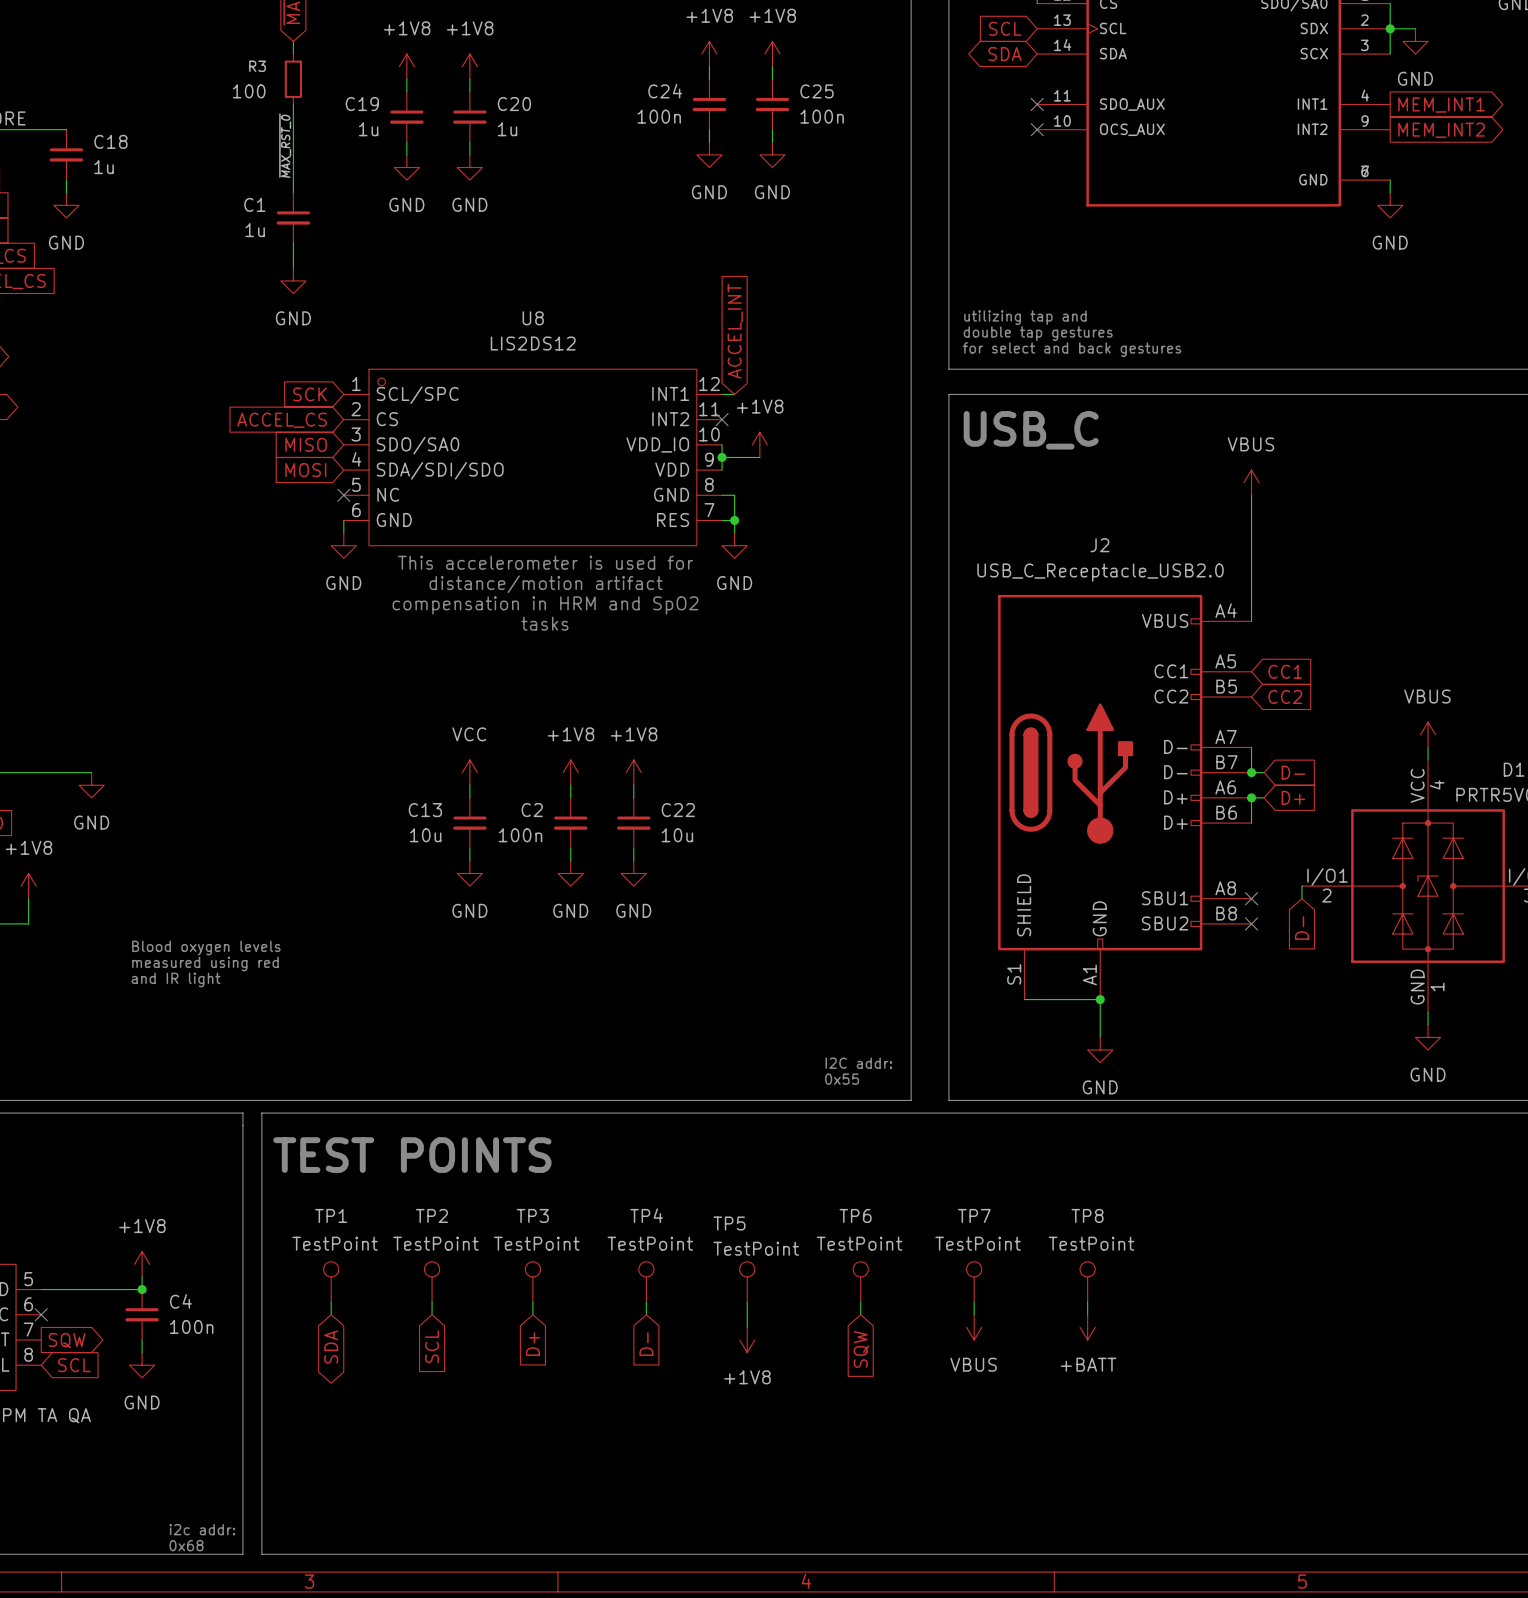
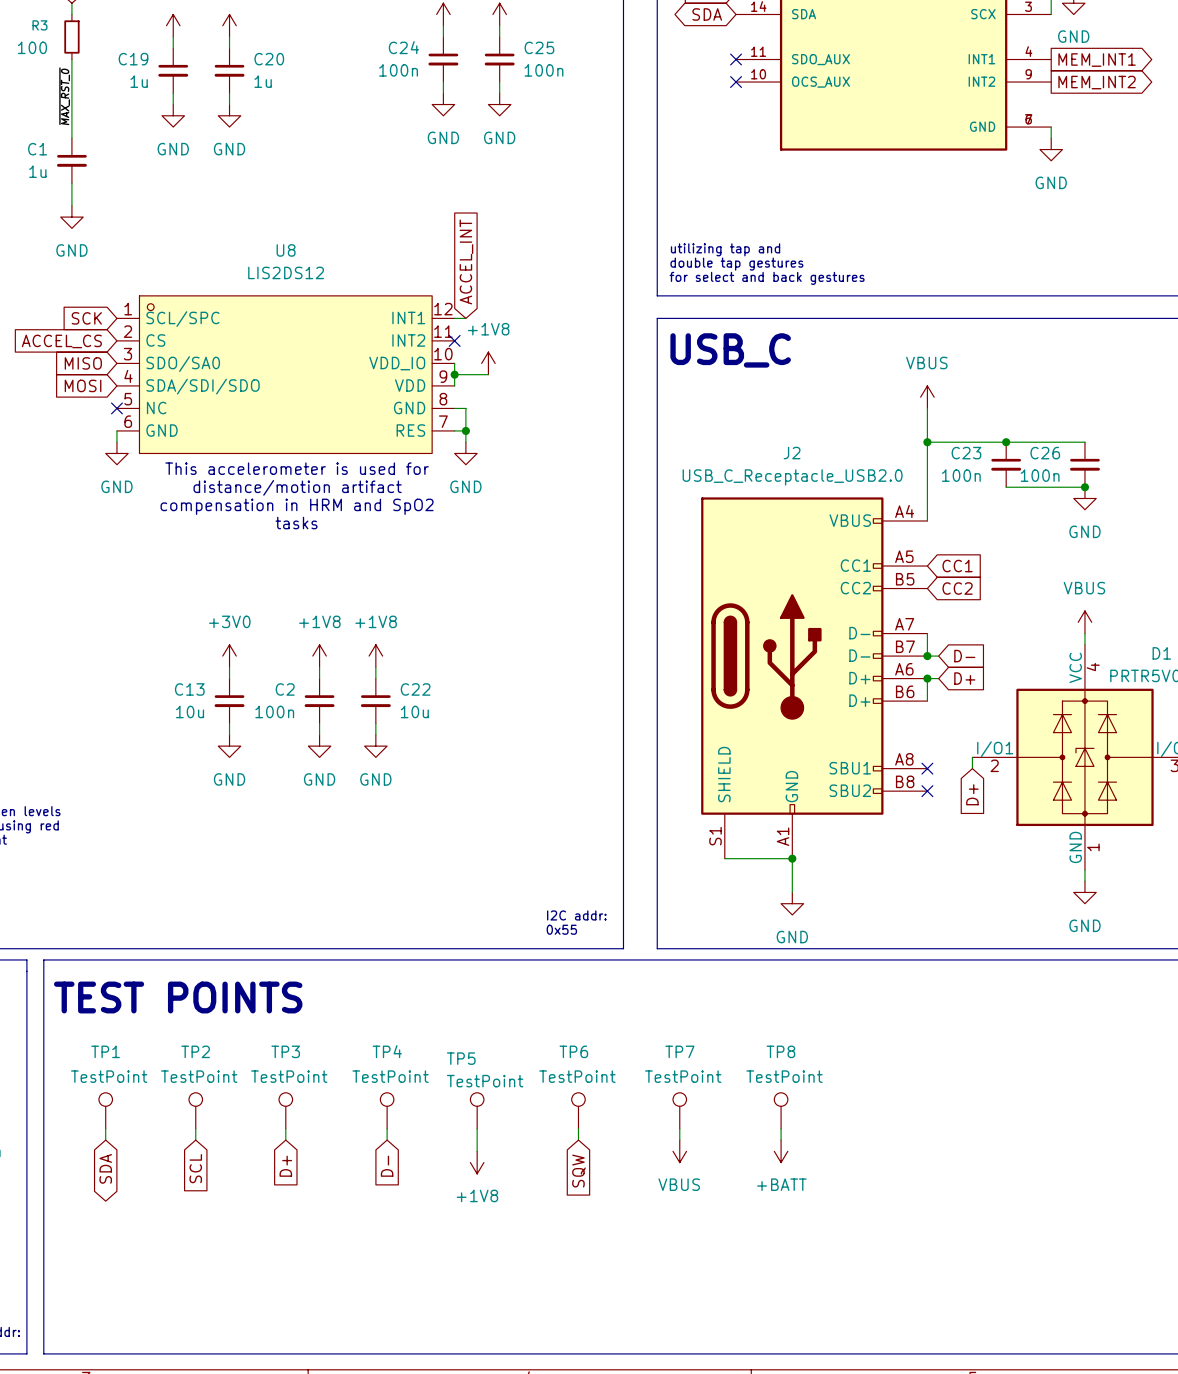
wire: none -> (927, 442) (1084, 442)
junction: none -> (927, 442)
junction: none -> (1006, 442)
C23: none -> 100n (1006, 464)
C26: none -> 100n (1084, 464)
wire: none -> (1006, 487) (1084, 487)
junction: none -> (1084, 487)
power symbol: none -> GND (1084, 498)
power symbol: VCC (469, 772) -> +3V0 (229, 656)
global label: D- (1301, 928) -> D+ (972, 794)

